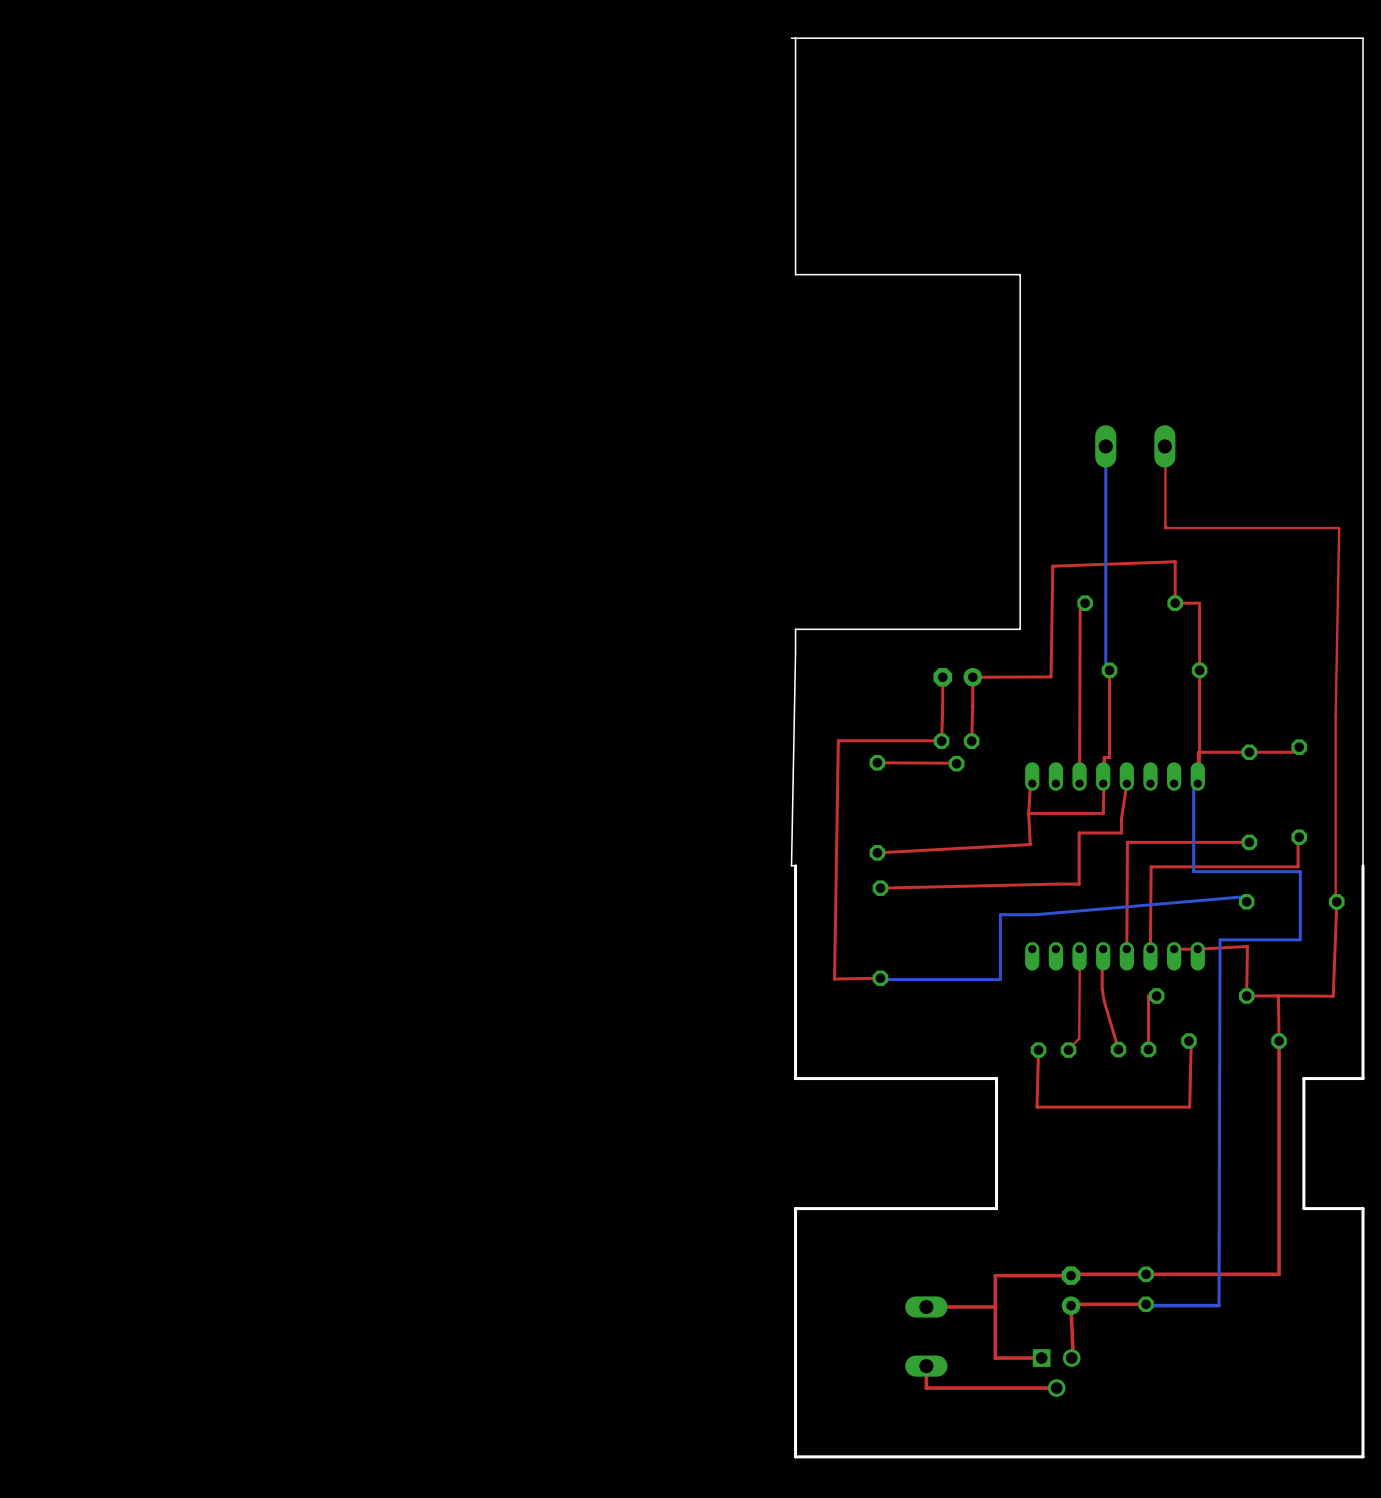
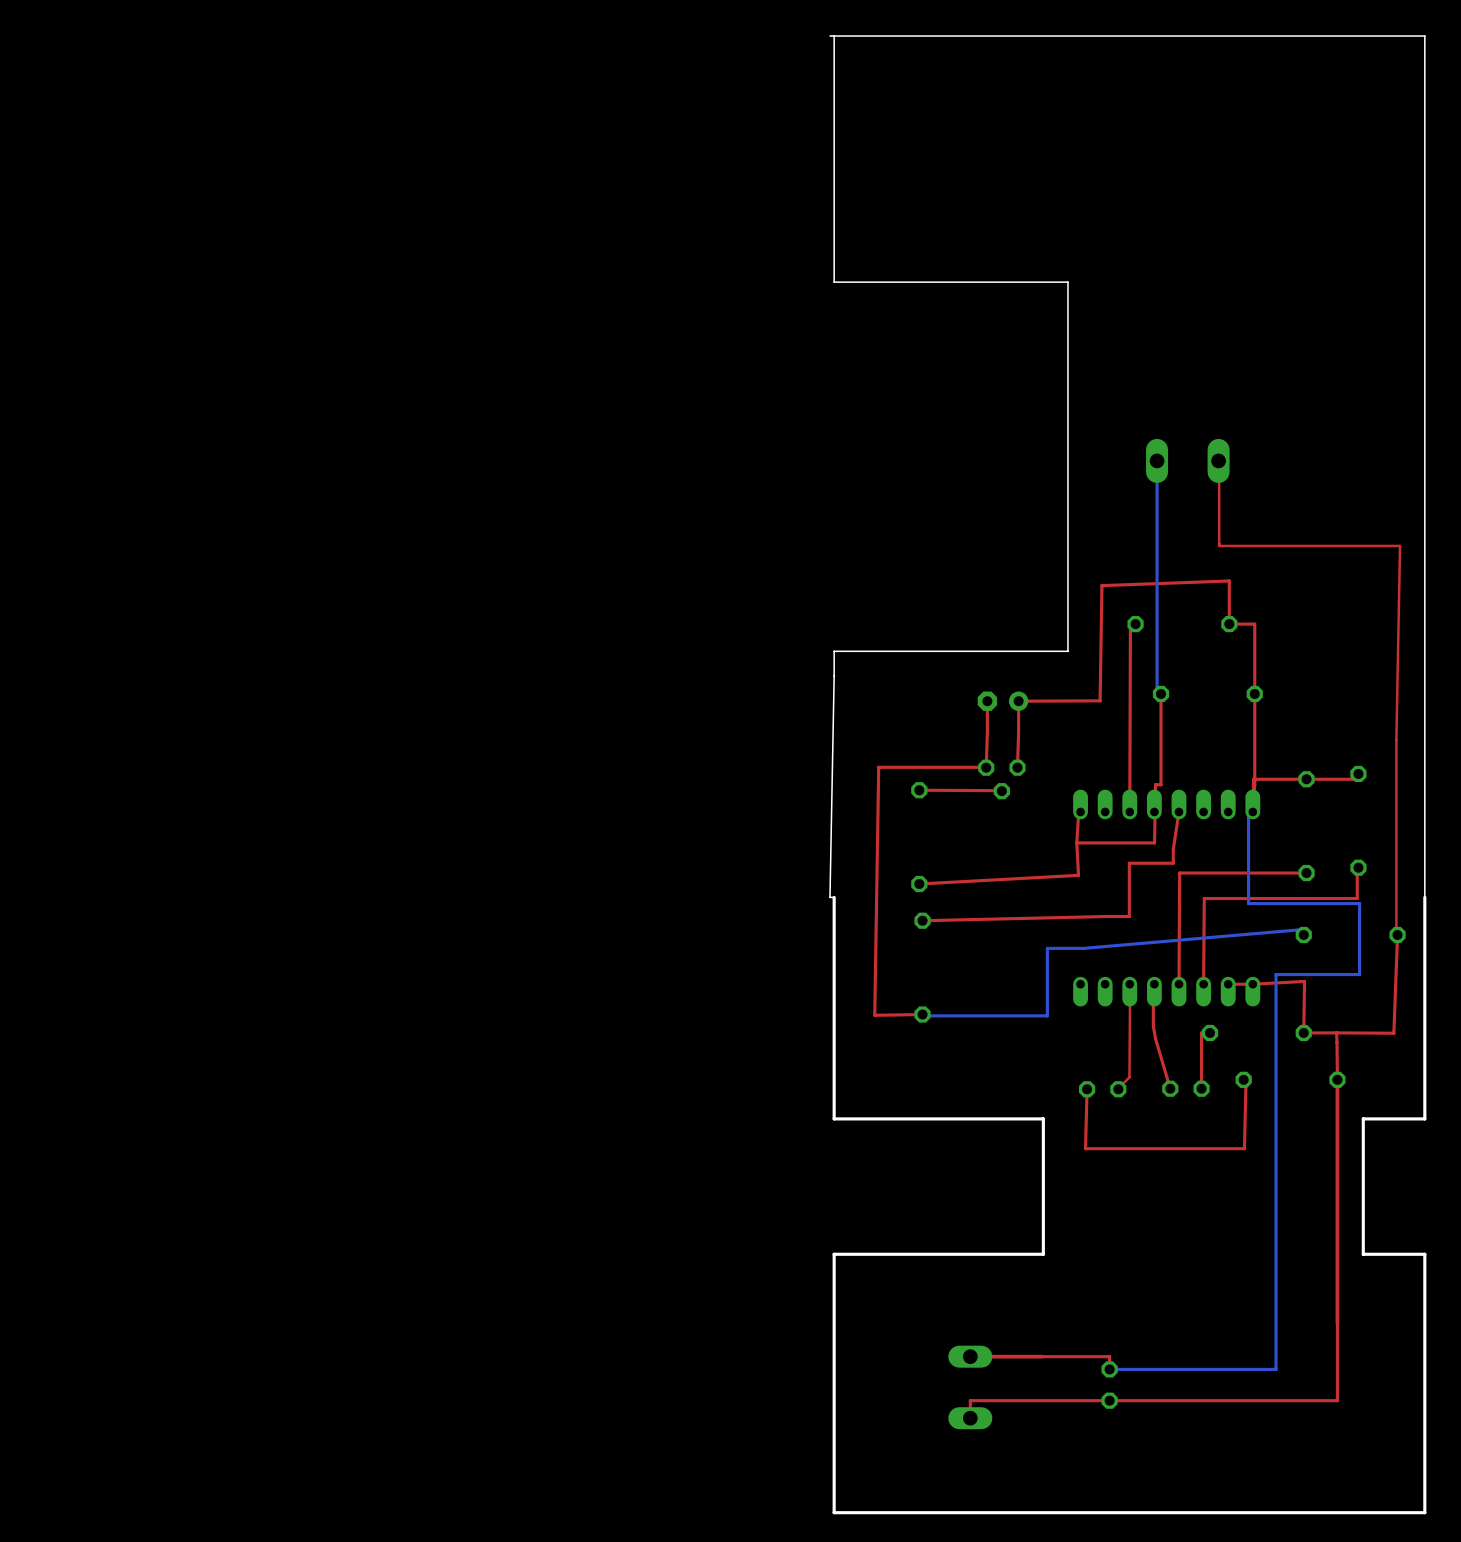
bottom track: (1220, 939) (1219, 1305) (1146, 1304) -> (1276, 974) (1276, 1369) (1109, 1369)
top track: (1279, 1274) (995, 1275) (995, 1358) (1041, 1358) -> (1337, 1322) (1337, 1400) (970, 1400) (970, 1418)
part position: (1146, 1289) -> (1109, 1385)
part: (1071, 1290) -> none
top track: (1146, 1304) (1071, 1304) (1073, 1358) (1071, 1358) -> none
top track: none -> (1042, 1356) (1109, 1356) (1109, 1369)
top track: (926, 1366) (926, 1388) (1056, 1388) -> none
part: (1056, 1373) -> none

